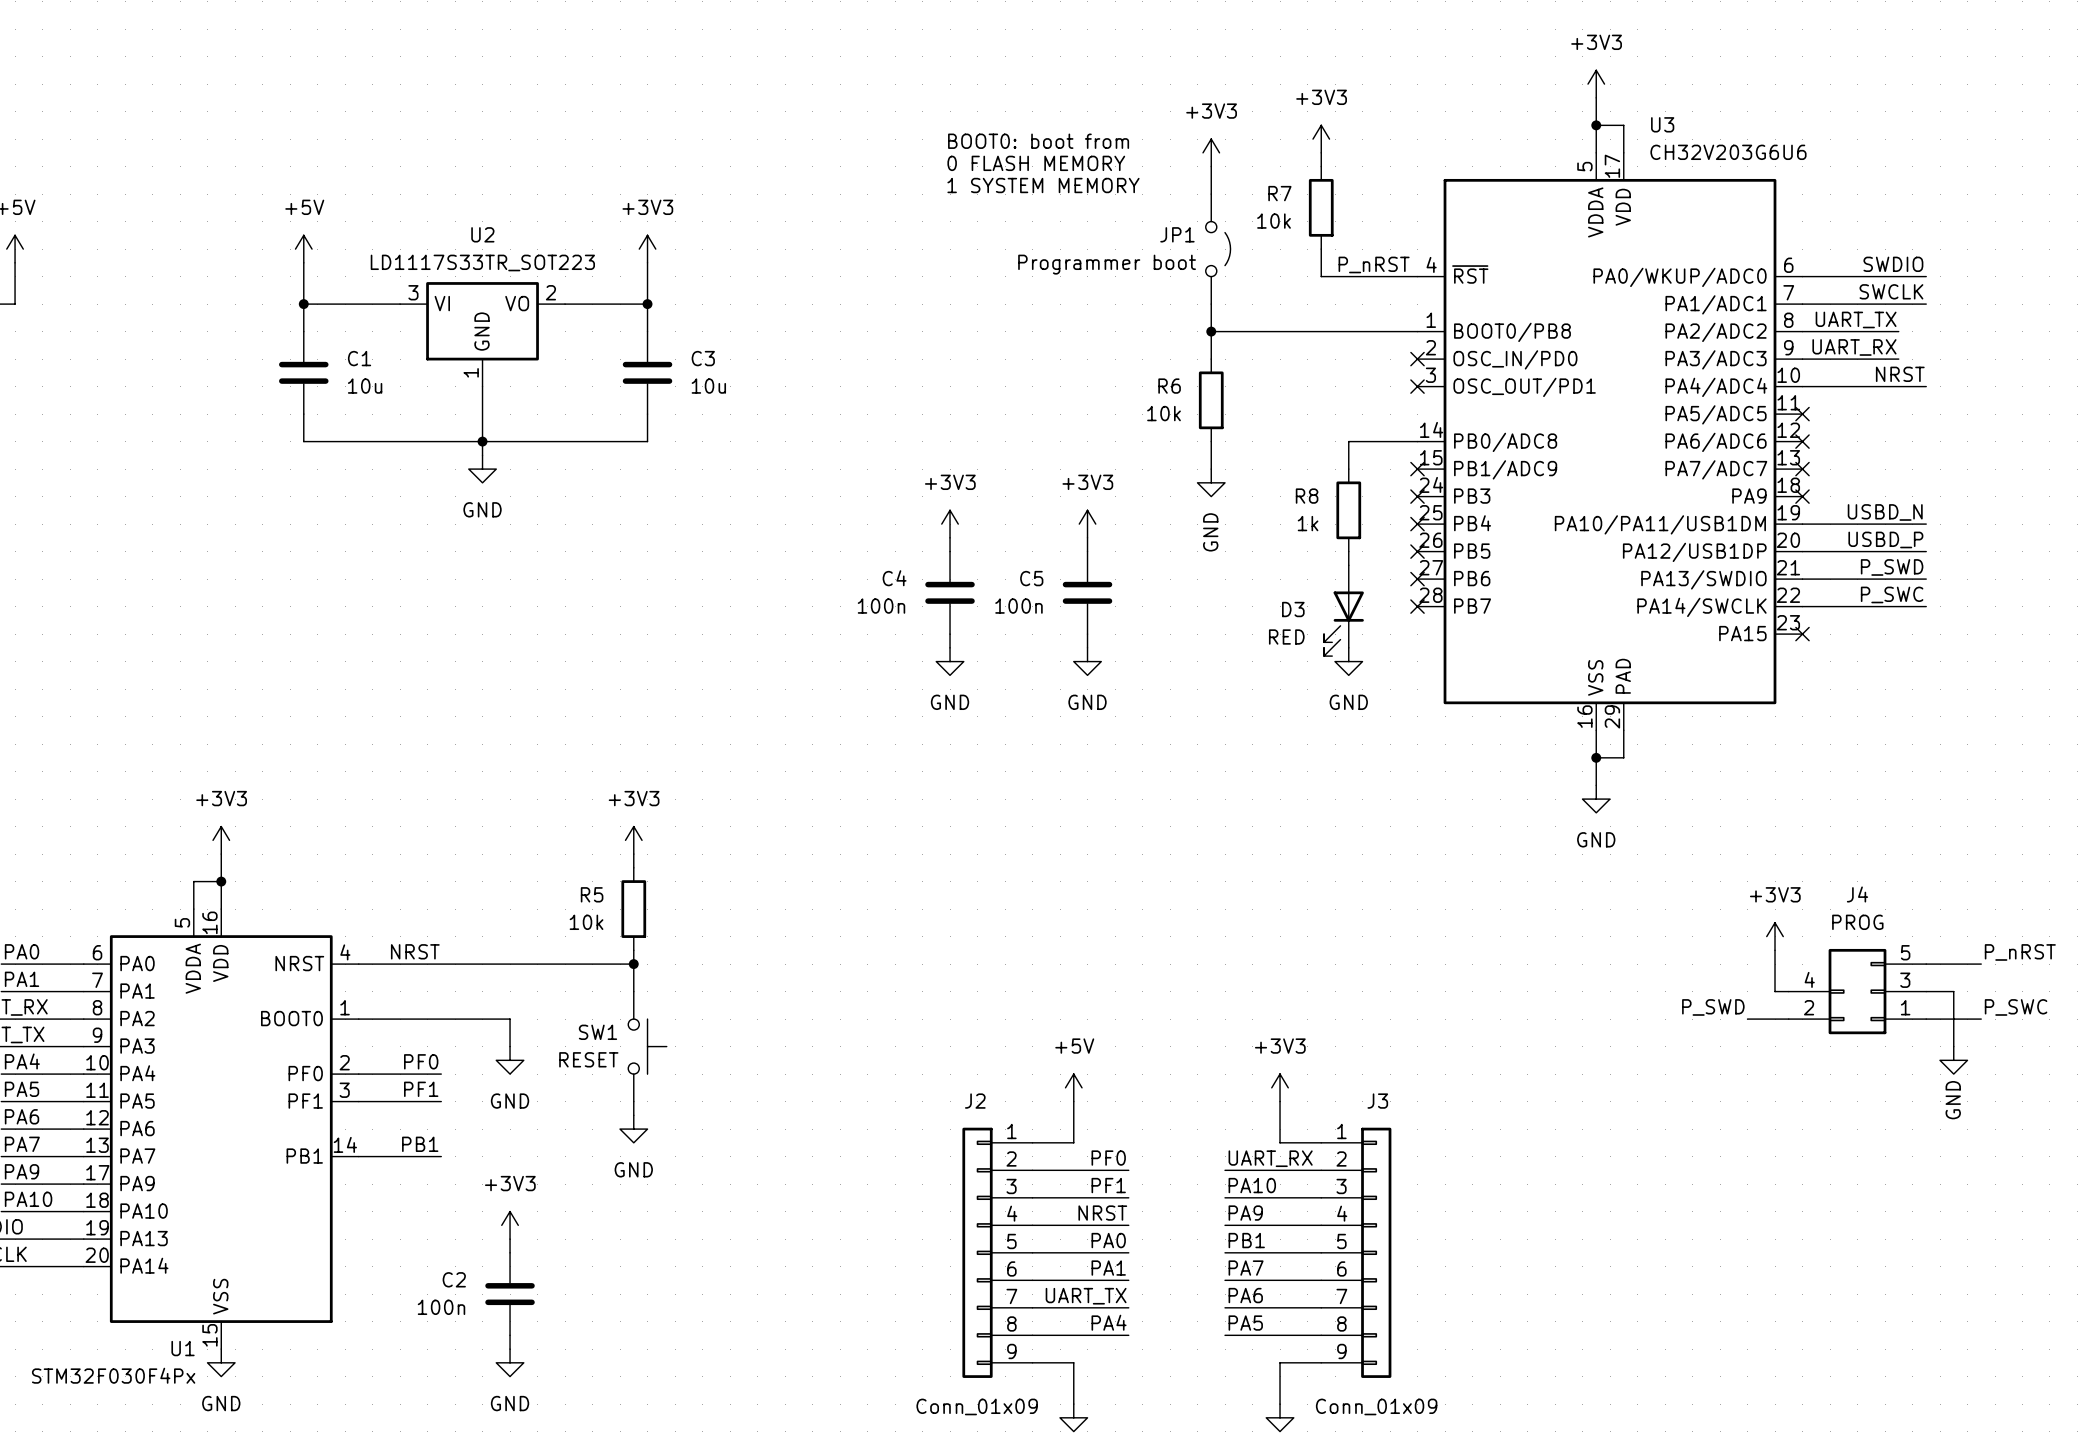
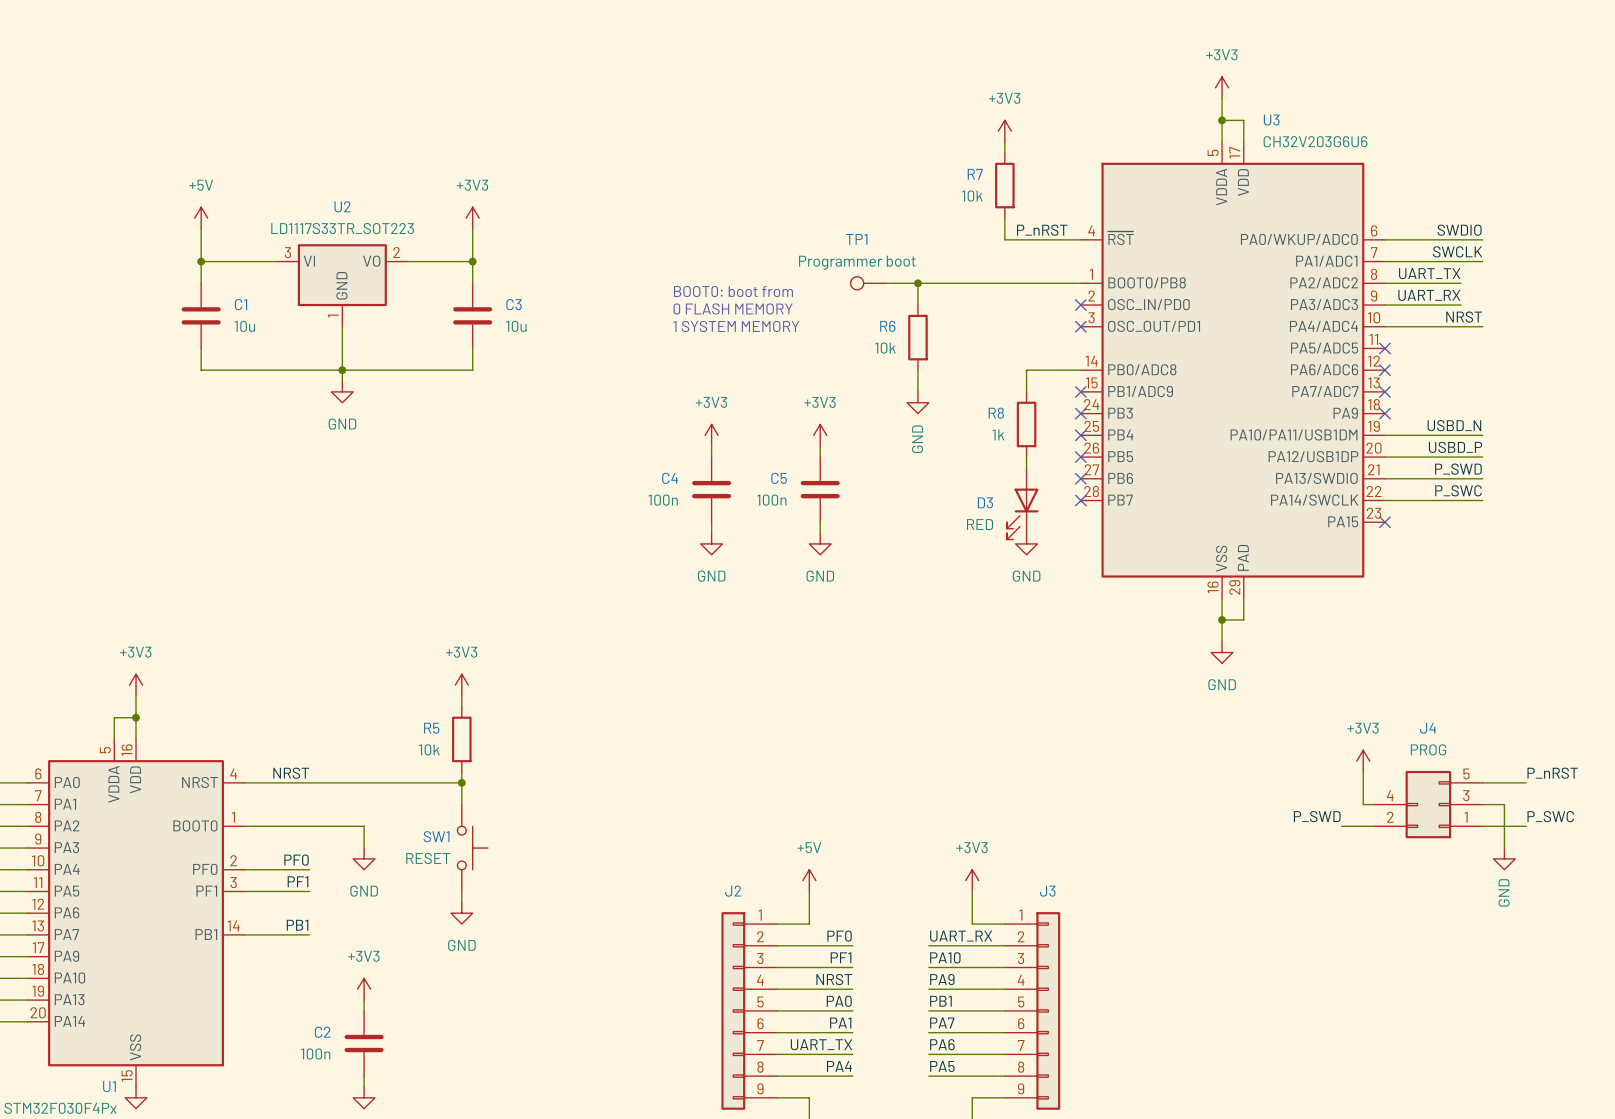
text position: BOOT0: boot from (1038, 141) -> BOOT0: boot from (733, 291)
power symbol: +3V3 (1211, 152) -> none
text position: 0 FLASH MEMORY (1036, 163) -> 0 FLASH MEMORY (733, 308)
wire: (1211, 166) (1211, 194) -> none
text position: 1 SYSTEM MEMORY (1043, 185) -> 1 SYSTEM MEMORY (736, 326)
JP1: Programmer boot (1218, 249) -> none
wire: (1211, 304) (1211, 331) -> (885, 283) (917, 283)
TP1: none -> Programmer boot (867, 283)

